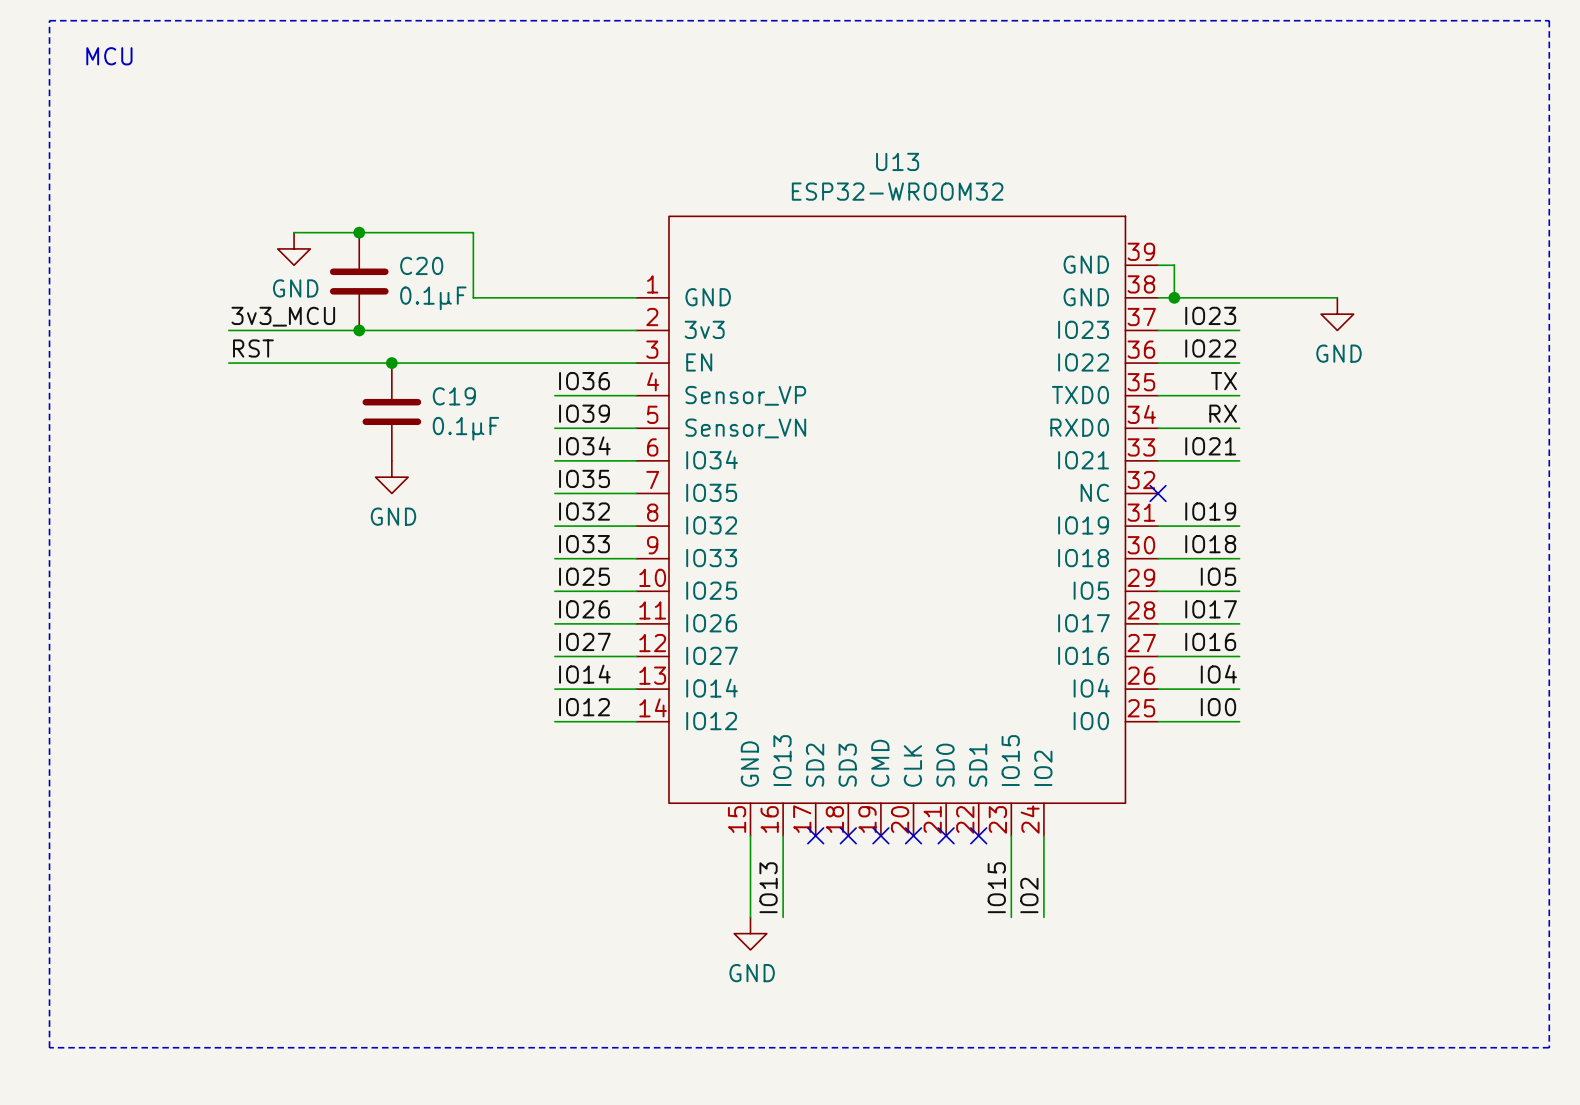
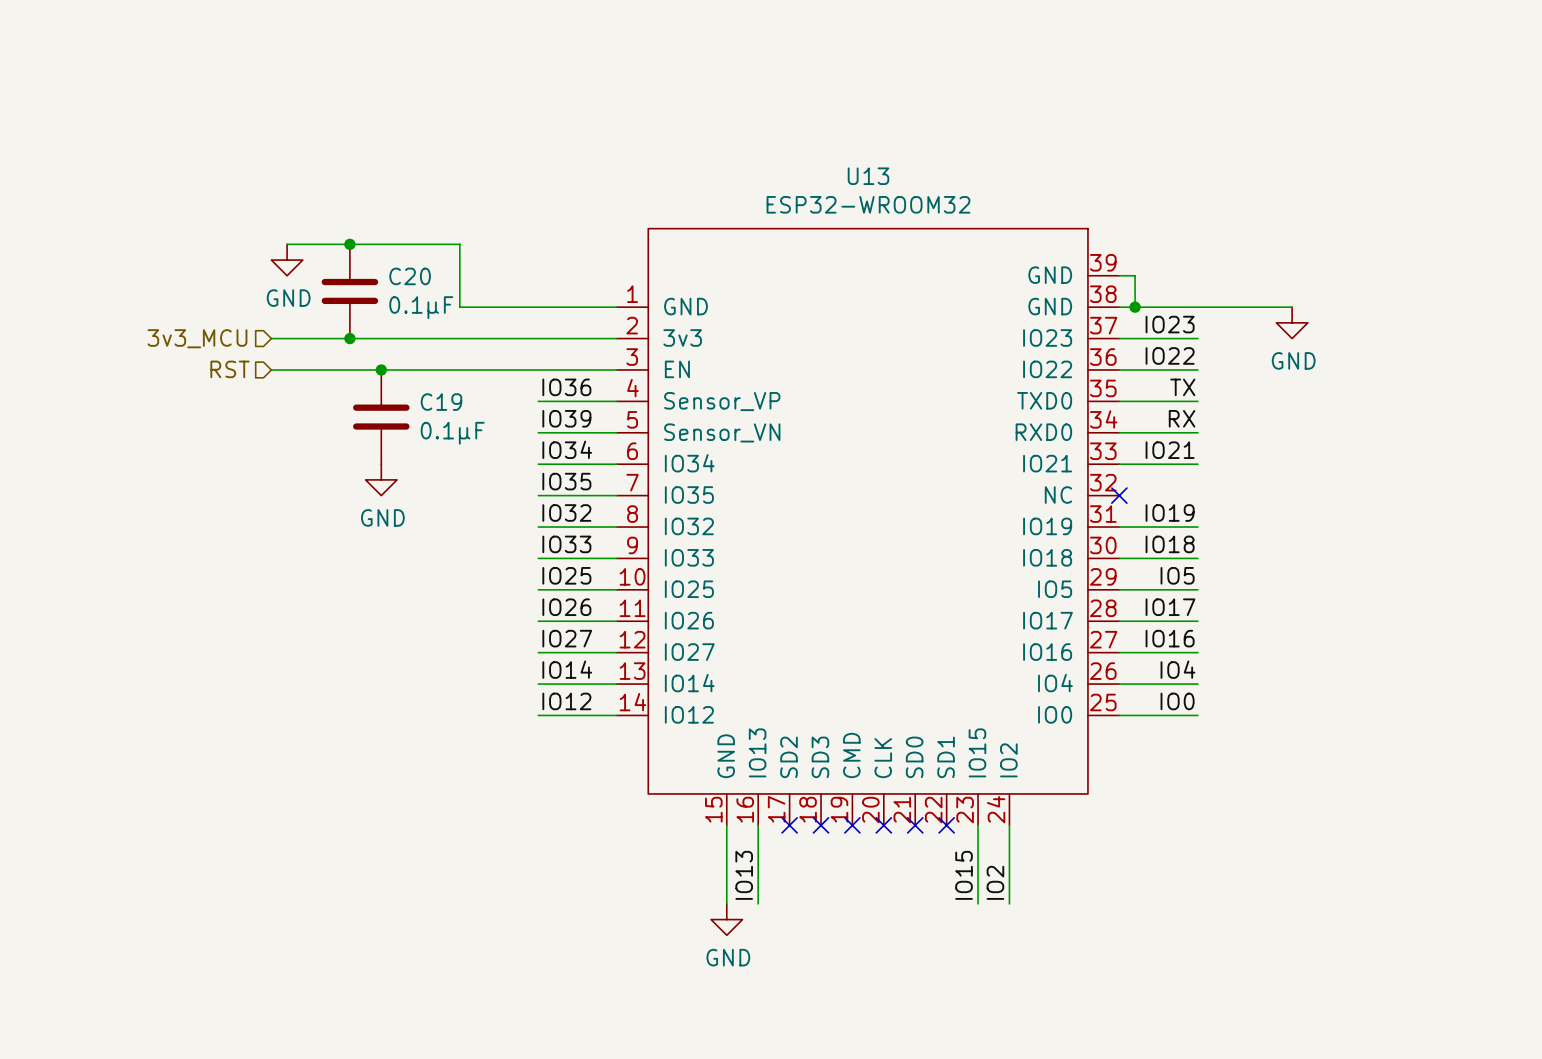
line: (49, 20) (1549, 20) (1549, 1047) (49, 1047) (49, 20) -> none
text: MCU (109, 56) -> none
label: 3v3_MCU (283, 316) -> none
hierarchical label: none -> 3v3_MCU (197, 338)
wire: (228, 330) (277, 330) -> none
label: RST (253, 348) -> none
hierarchical label: none -> RST (230, 369)
wire: (228, 363) (277, 363) -> none

